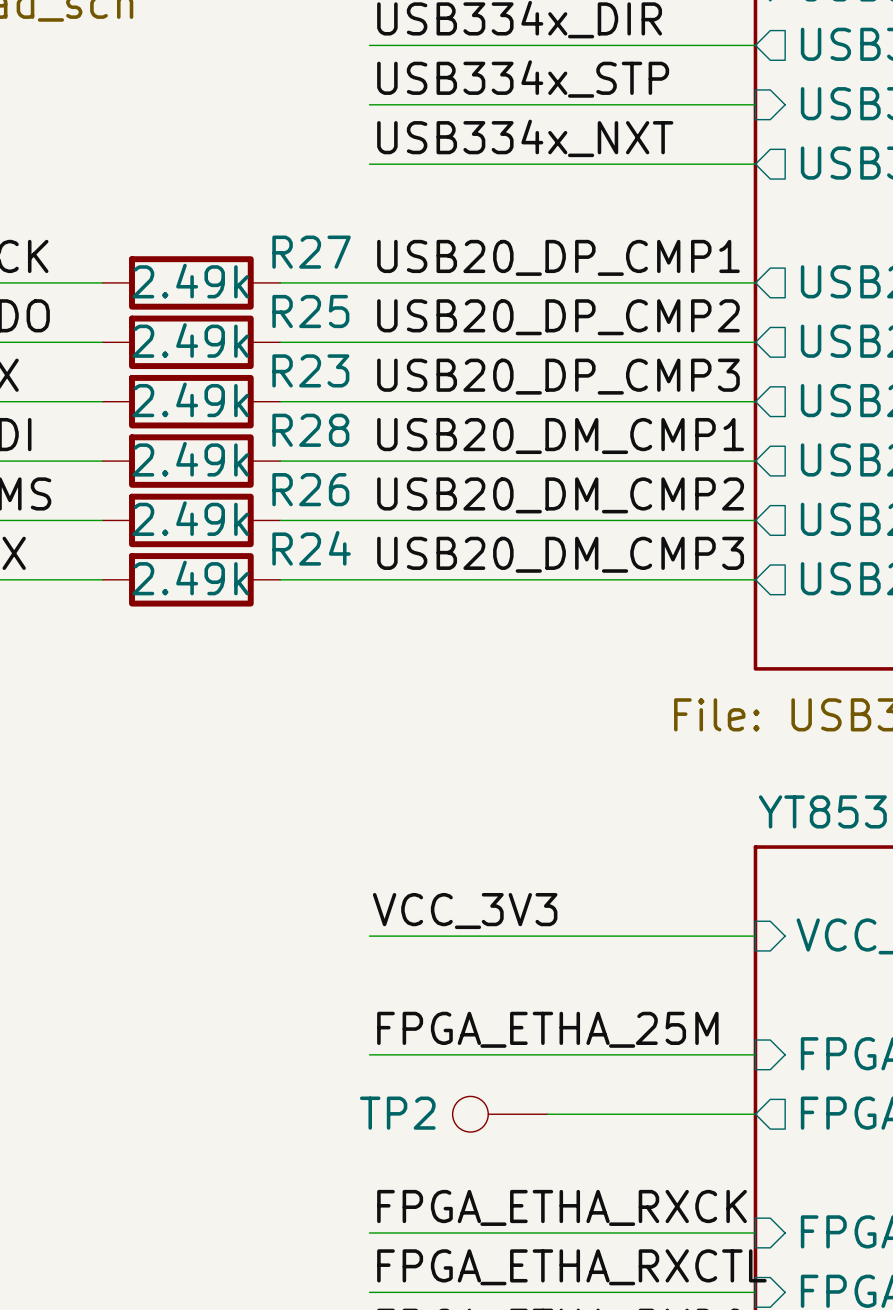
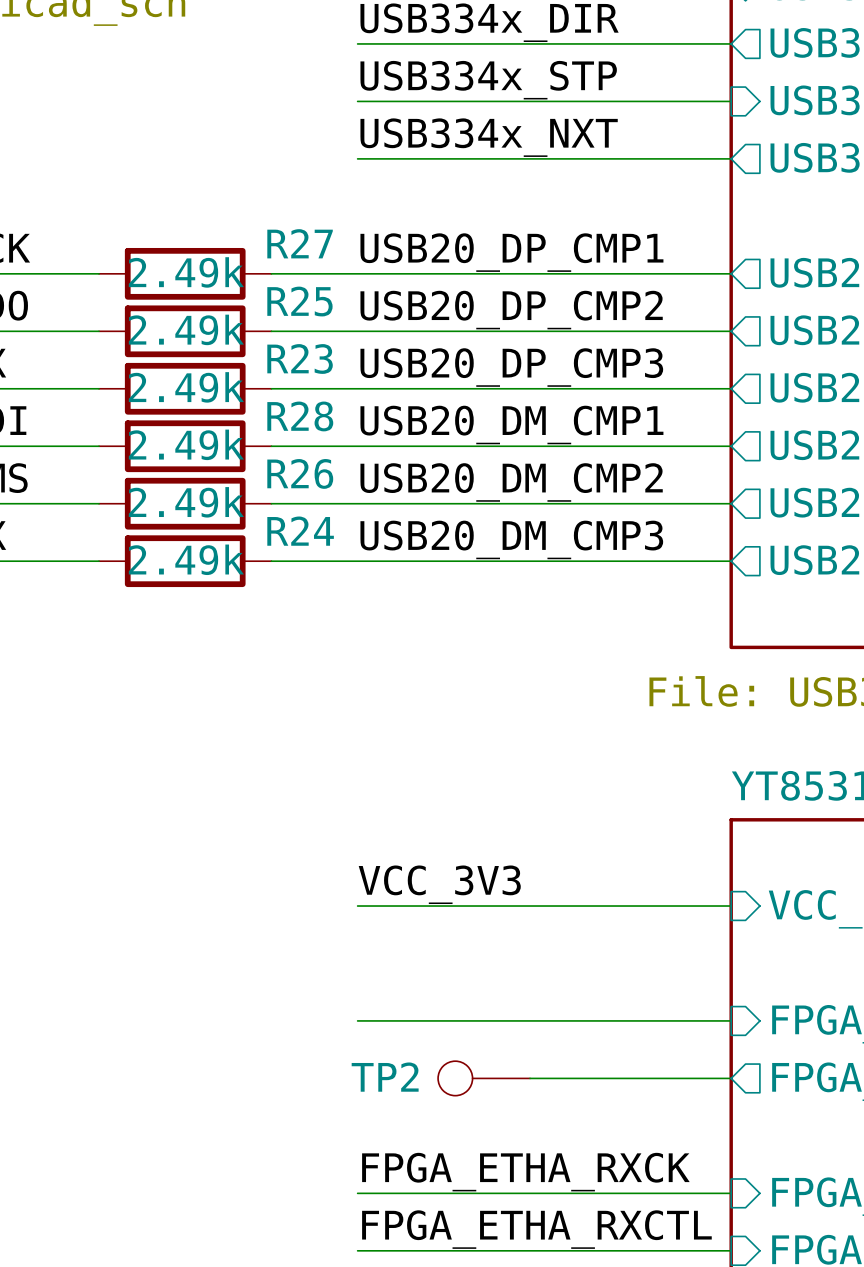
label: FPGA_ETHA_25M (547, 1029) -> none

